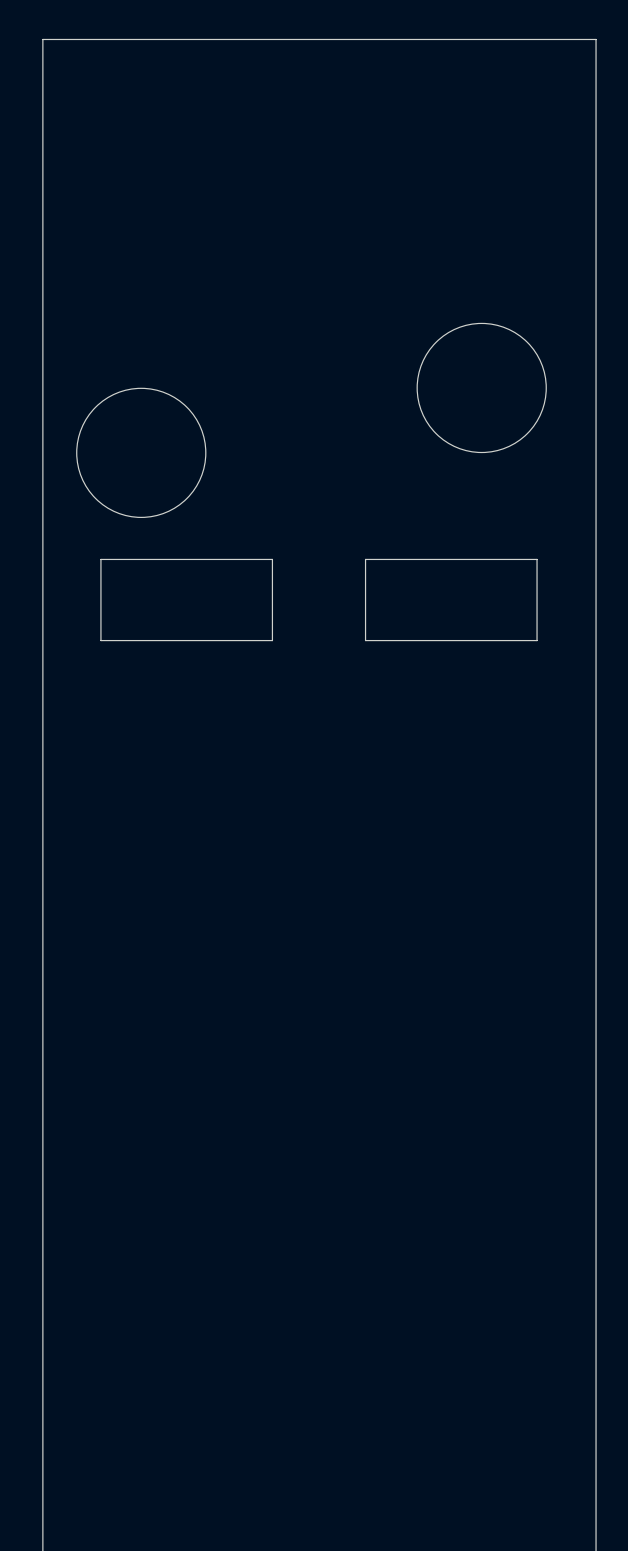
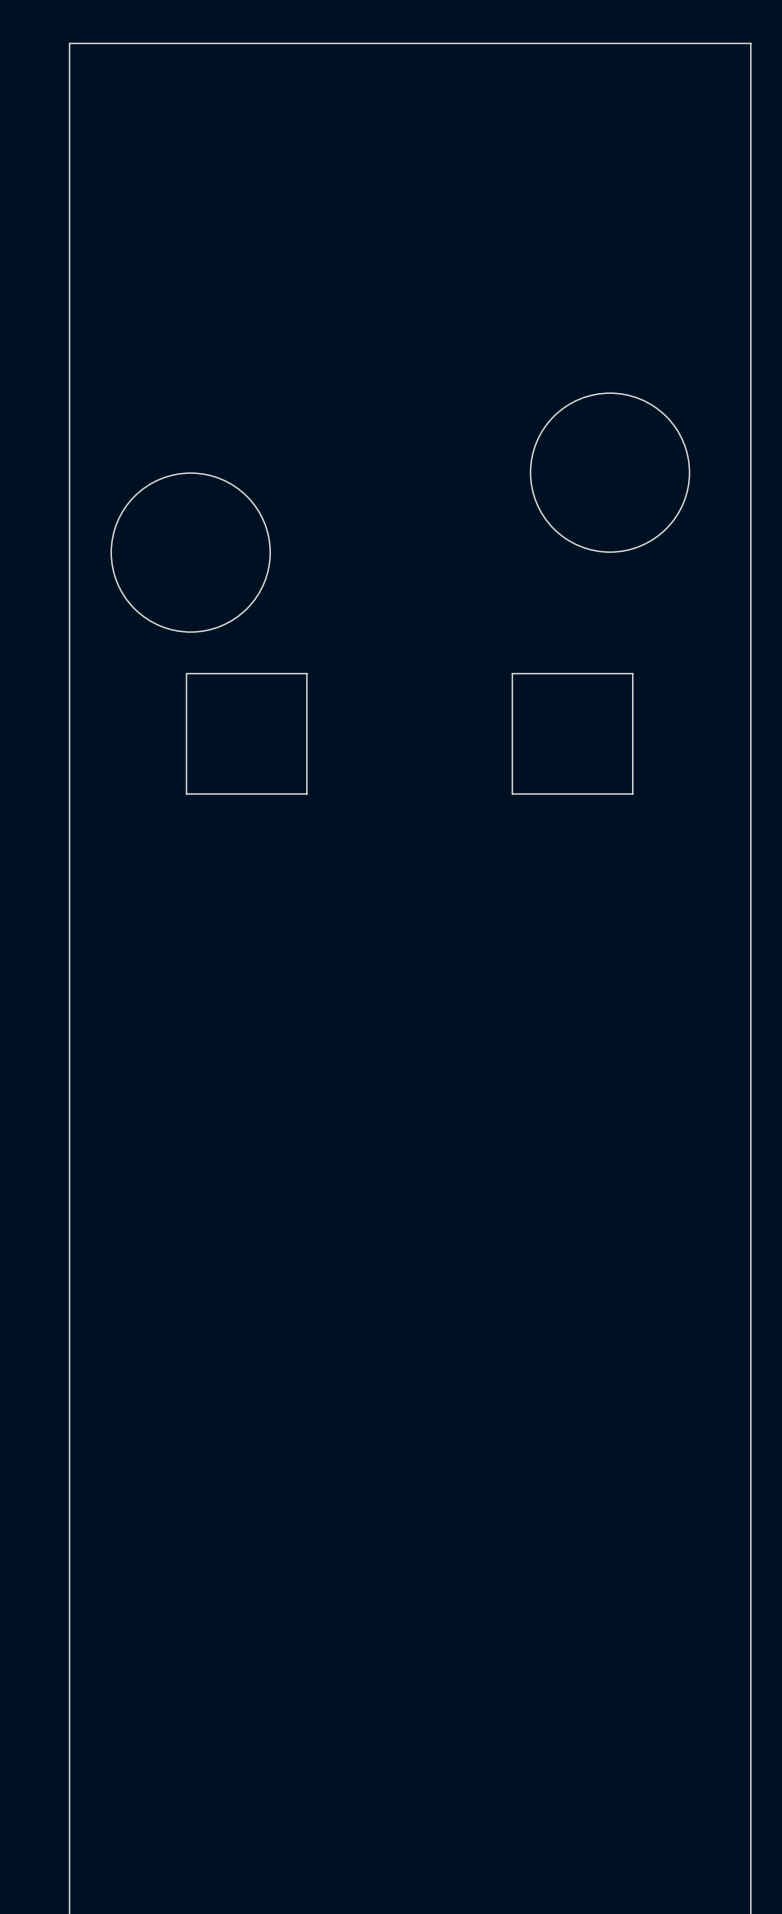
board edge: (272, 559) (100, 559) (100, 640) (272, 640) (272, 559) -> (306, 673) (306, 793) (186, 793) (186, 673) (306, 673)
board edge: (537, 559) (365, 559) (365, 640) (537, 640) (537, 559) -> (632, 673) (632, 793) (512, 793) (512, 673) (632, 673)

